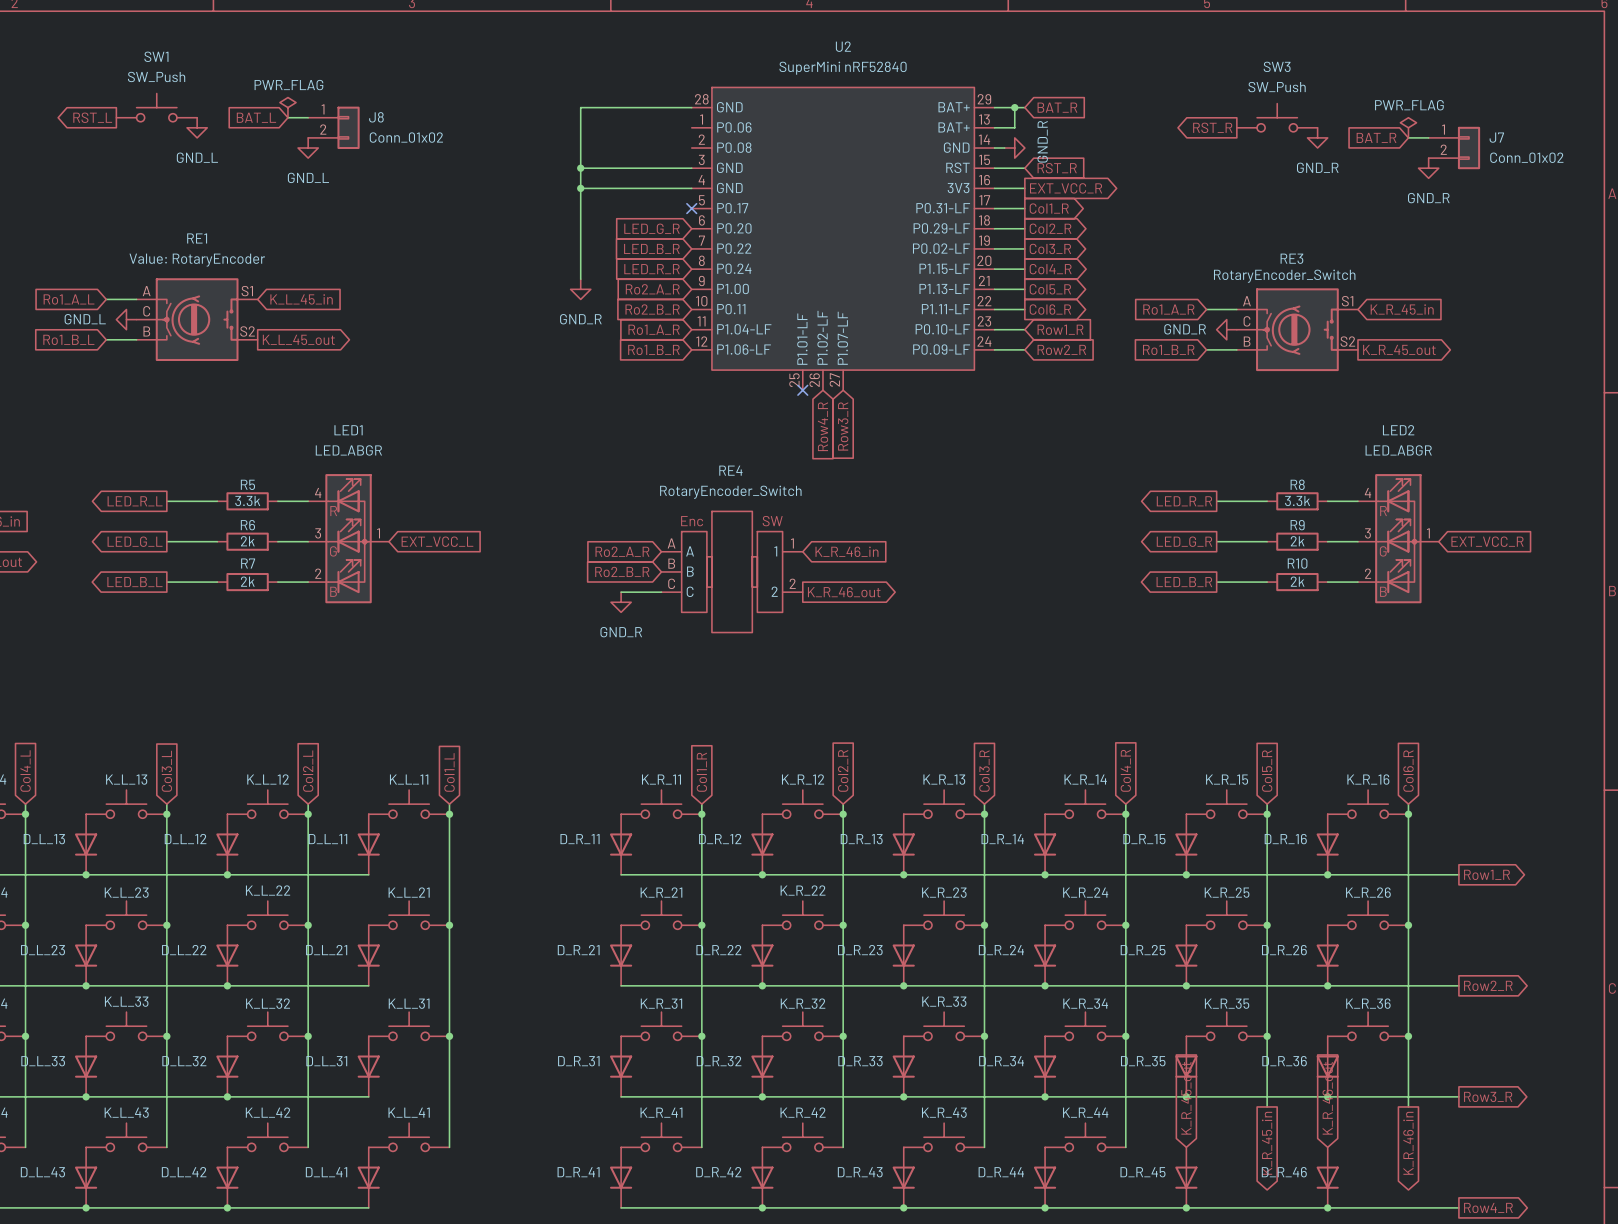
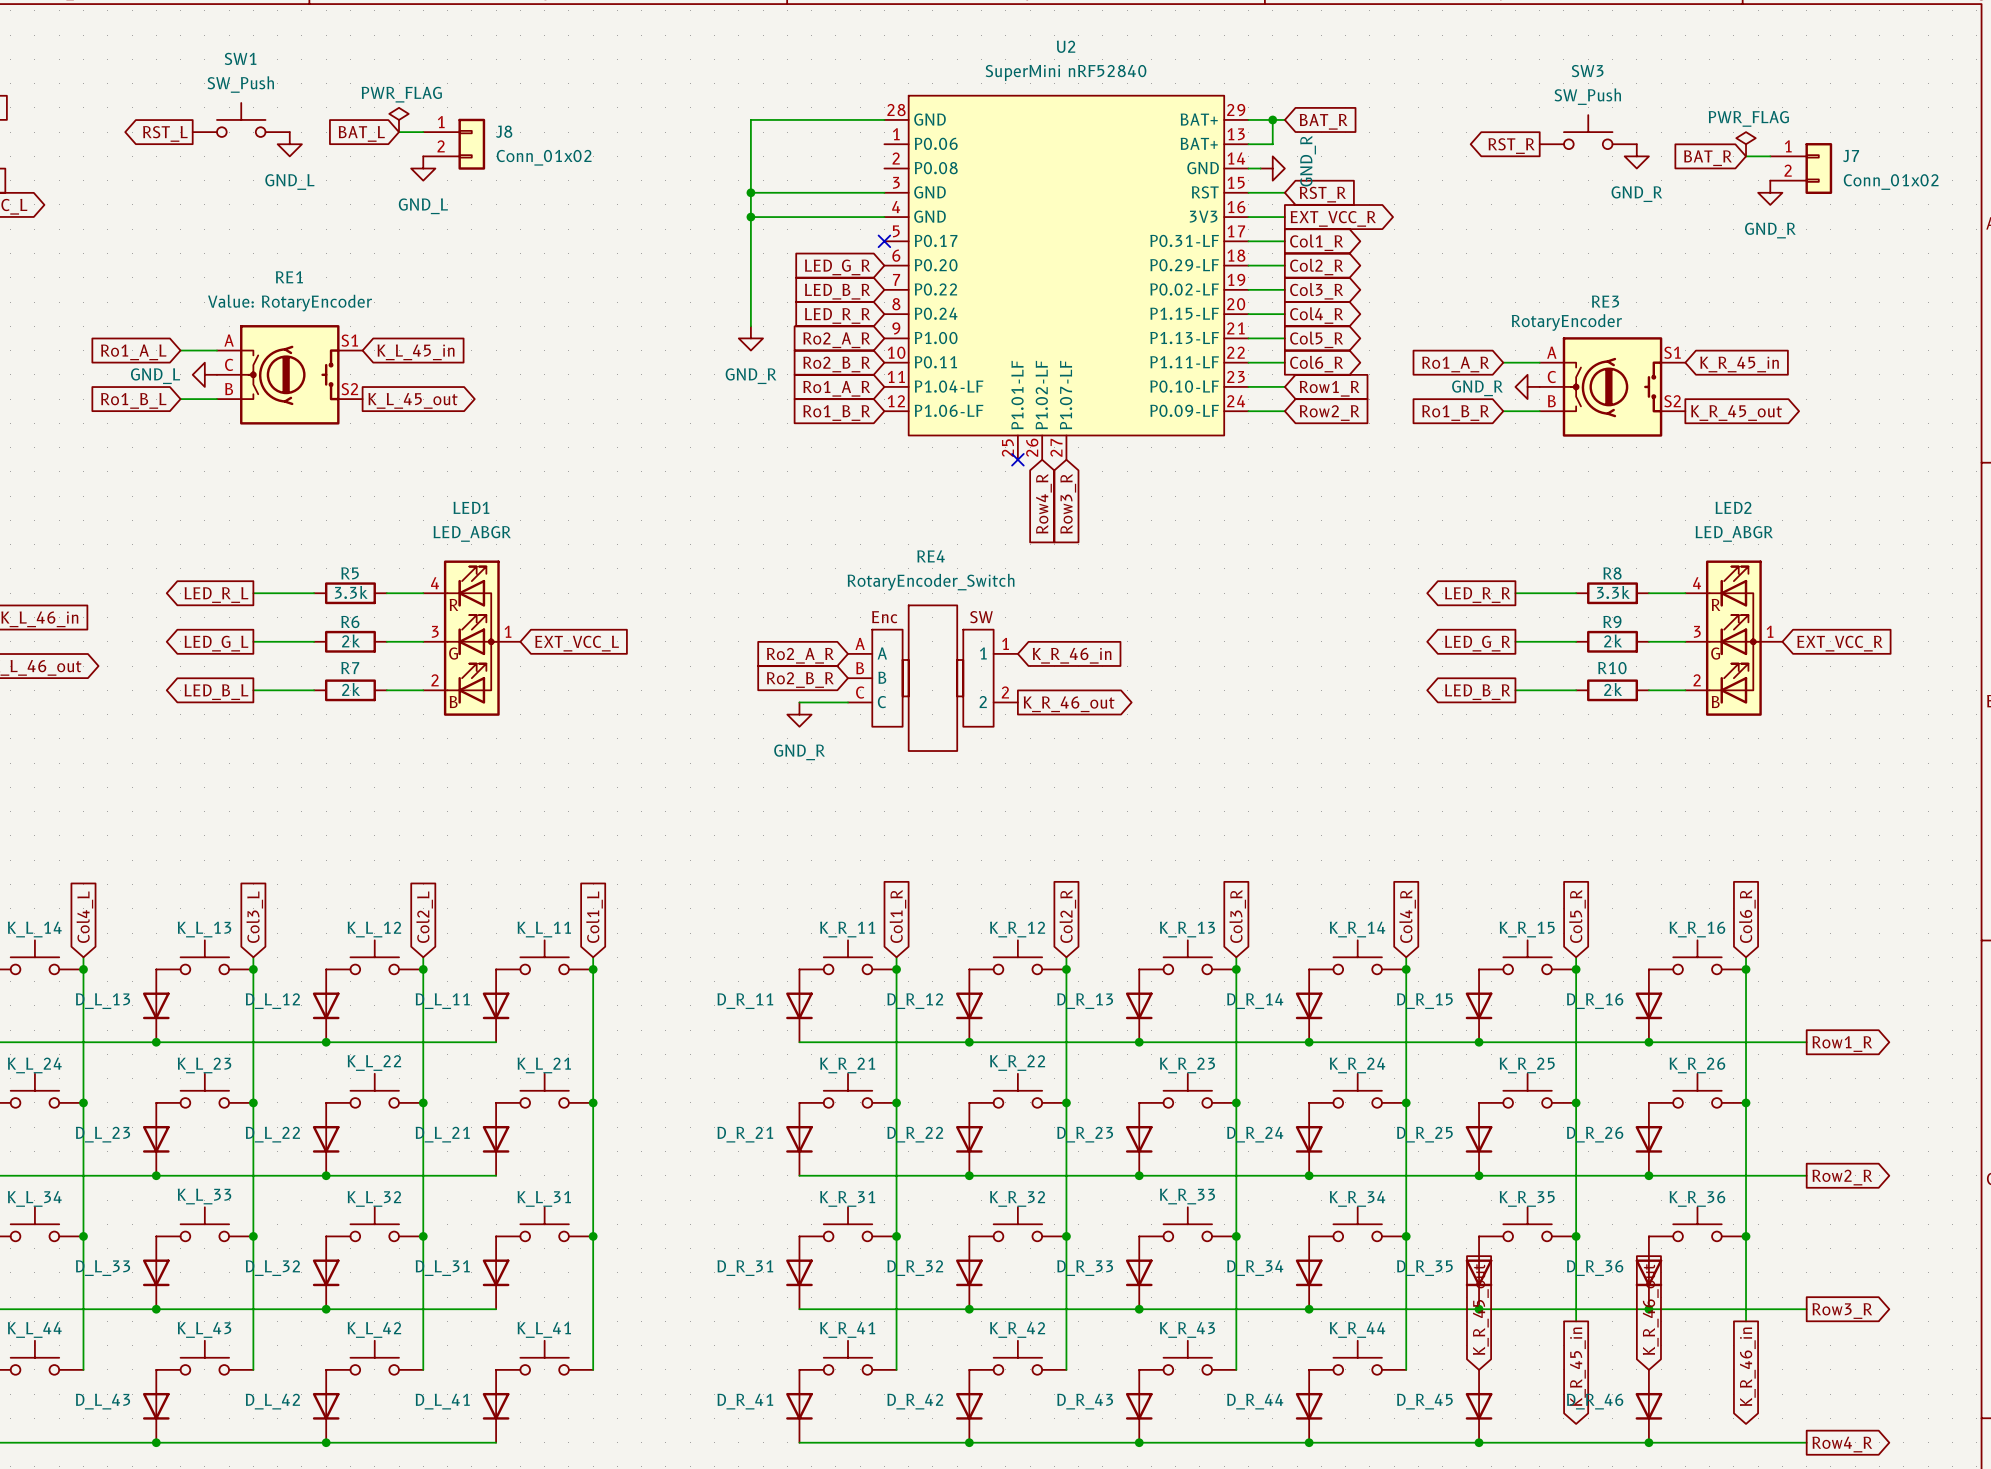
RE3 value: RotaryEncoder_Switch (1284, 276) -> RotaryEncoder (1566, 322)

